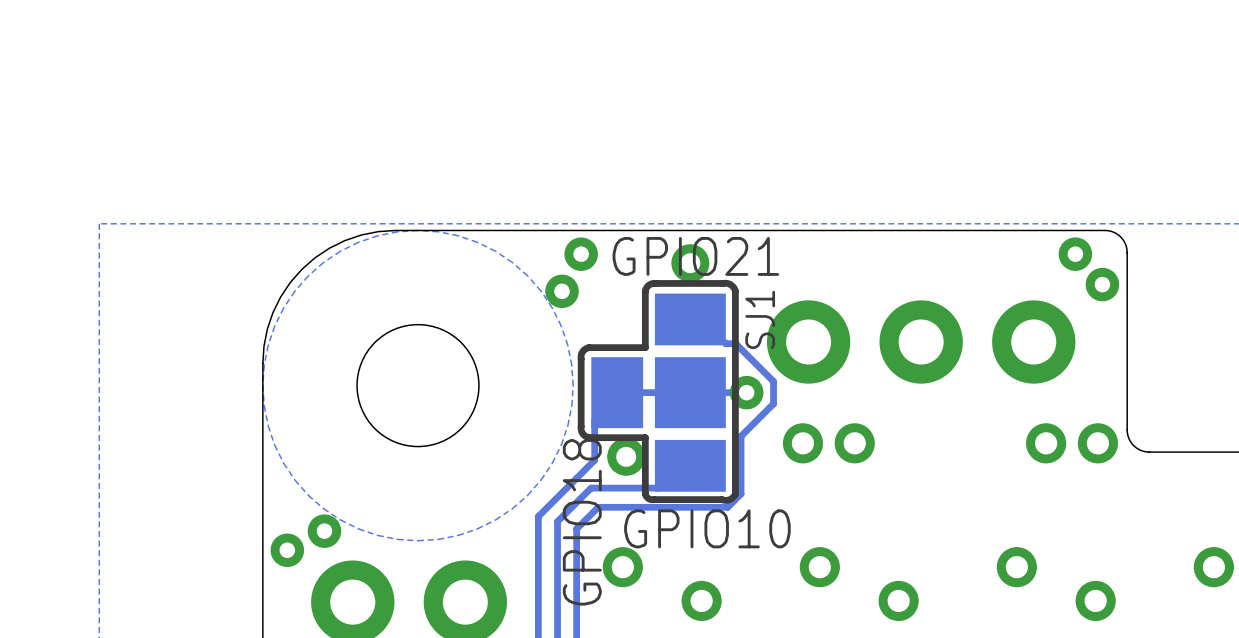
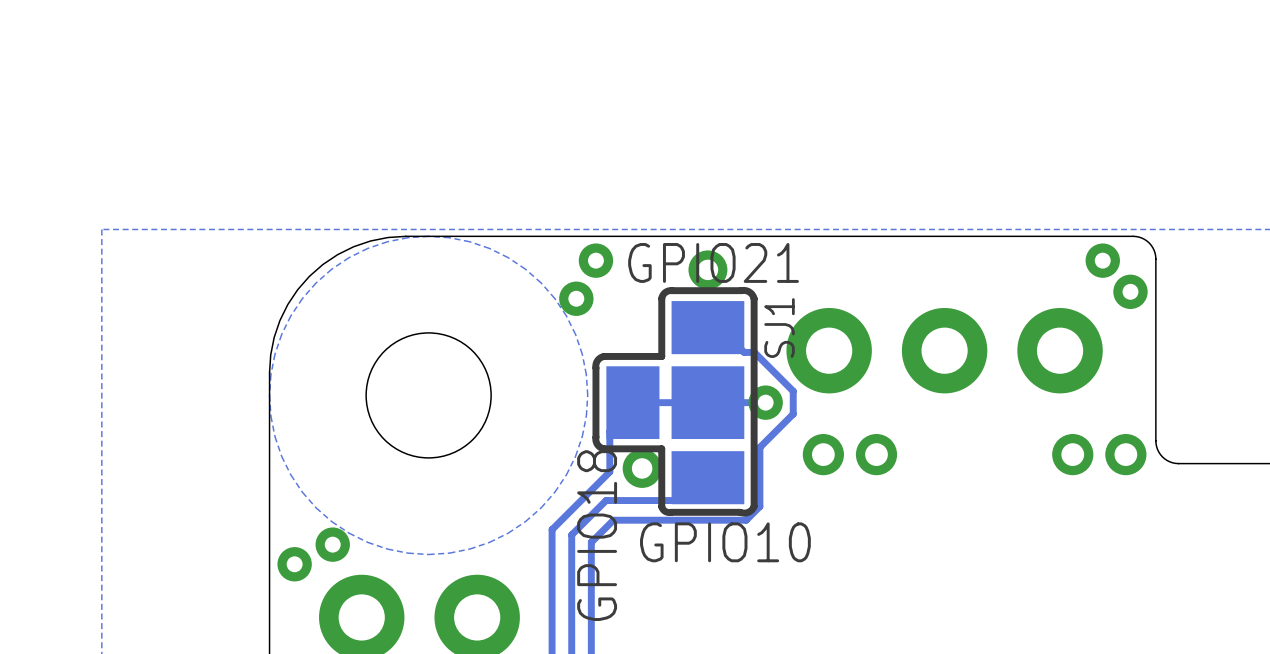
via: (622, 567) -> none
via: (819, 567) -> none
via: (1016, 567) -> none
via: (1213, 567) -> none
via: (701, 600) -> none
via: (898, 600) -> none
via: (1095, 600) -> none

